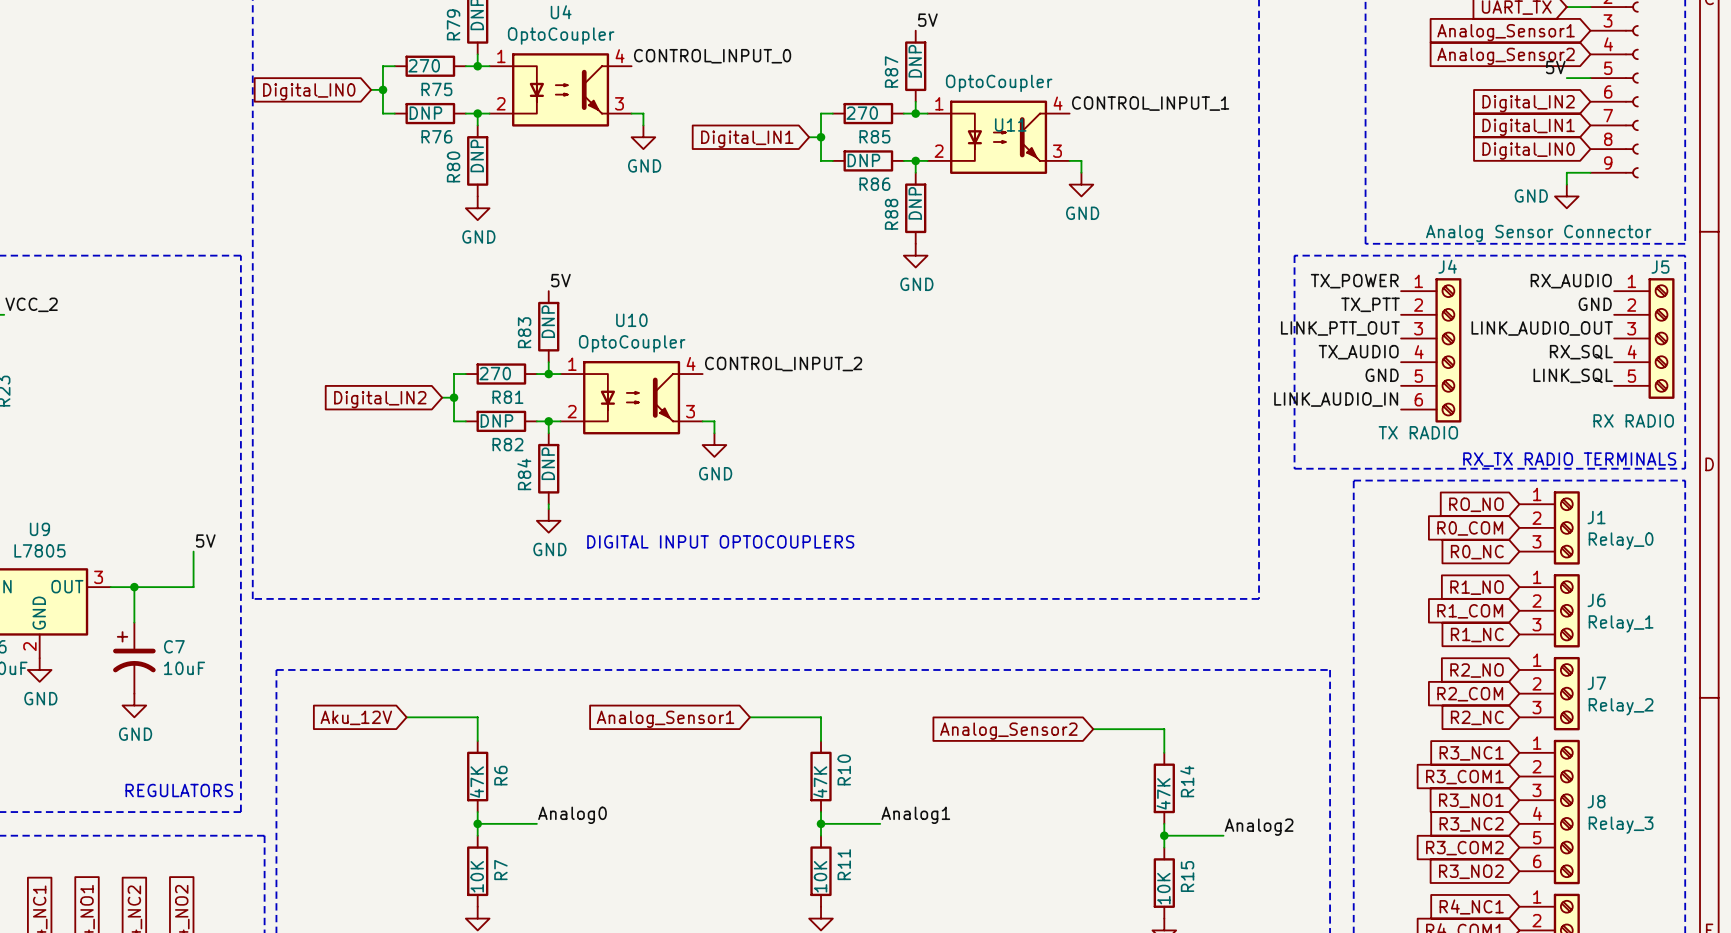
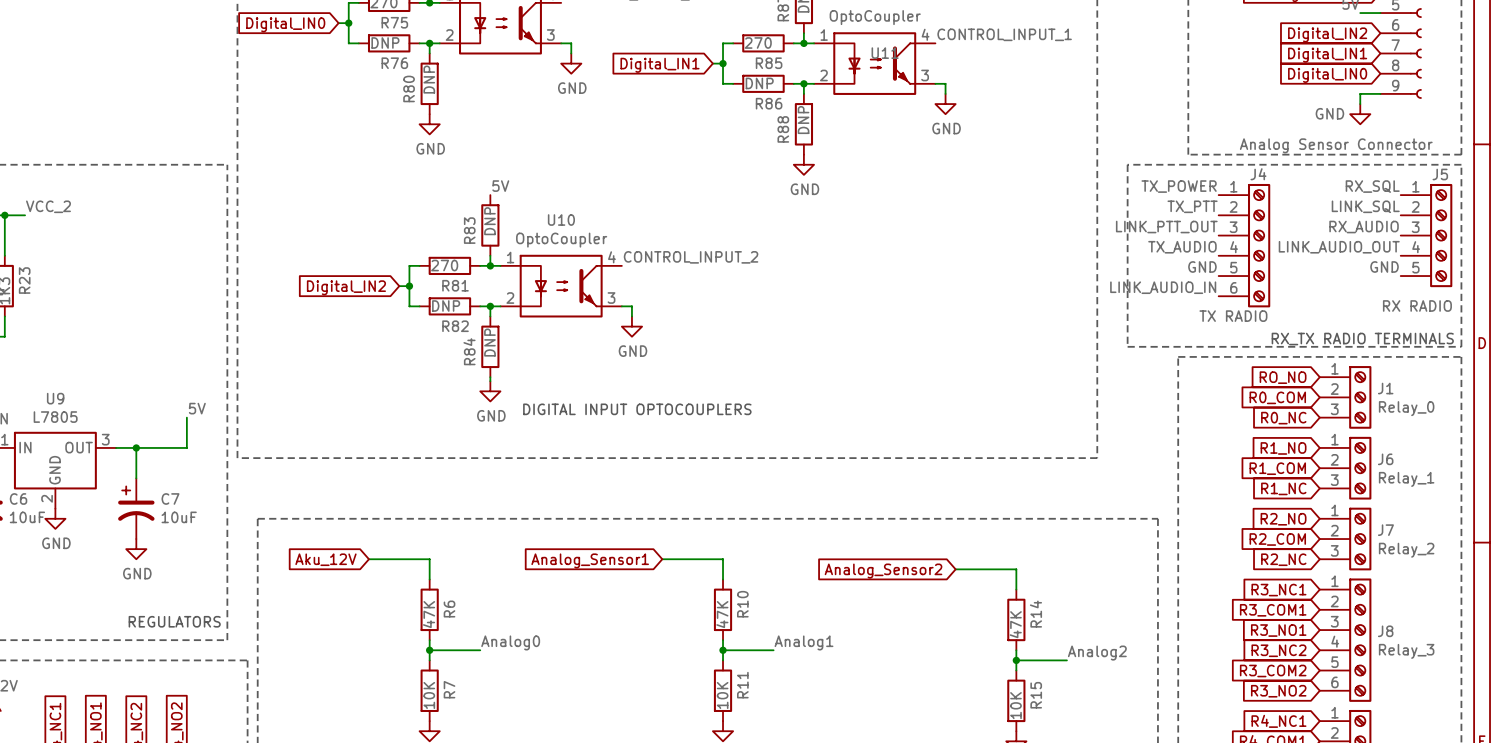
label: RX_AUDIO (1571, 281) -> RX_SQL (1372, 186)
label: GND (1595, 304) -> LINK_SQL (1365, 206)
label: LINK_AUDIO_OUT (1542, 328) -> RX_AUDIO (1364, 227)
label: RX_SQL (1581, 352) -> LINK_AUDIO_OUT (1339, 247)
label: LINK_SQL (1573, 375) -> GND (1384, 266)

